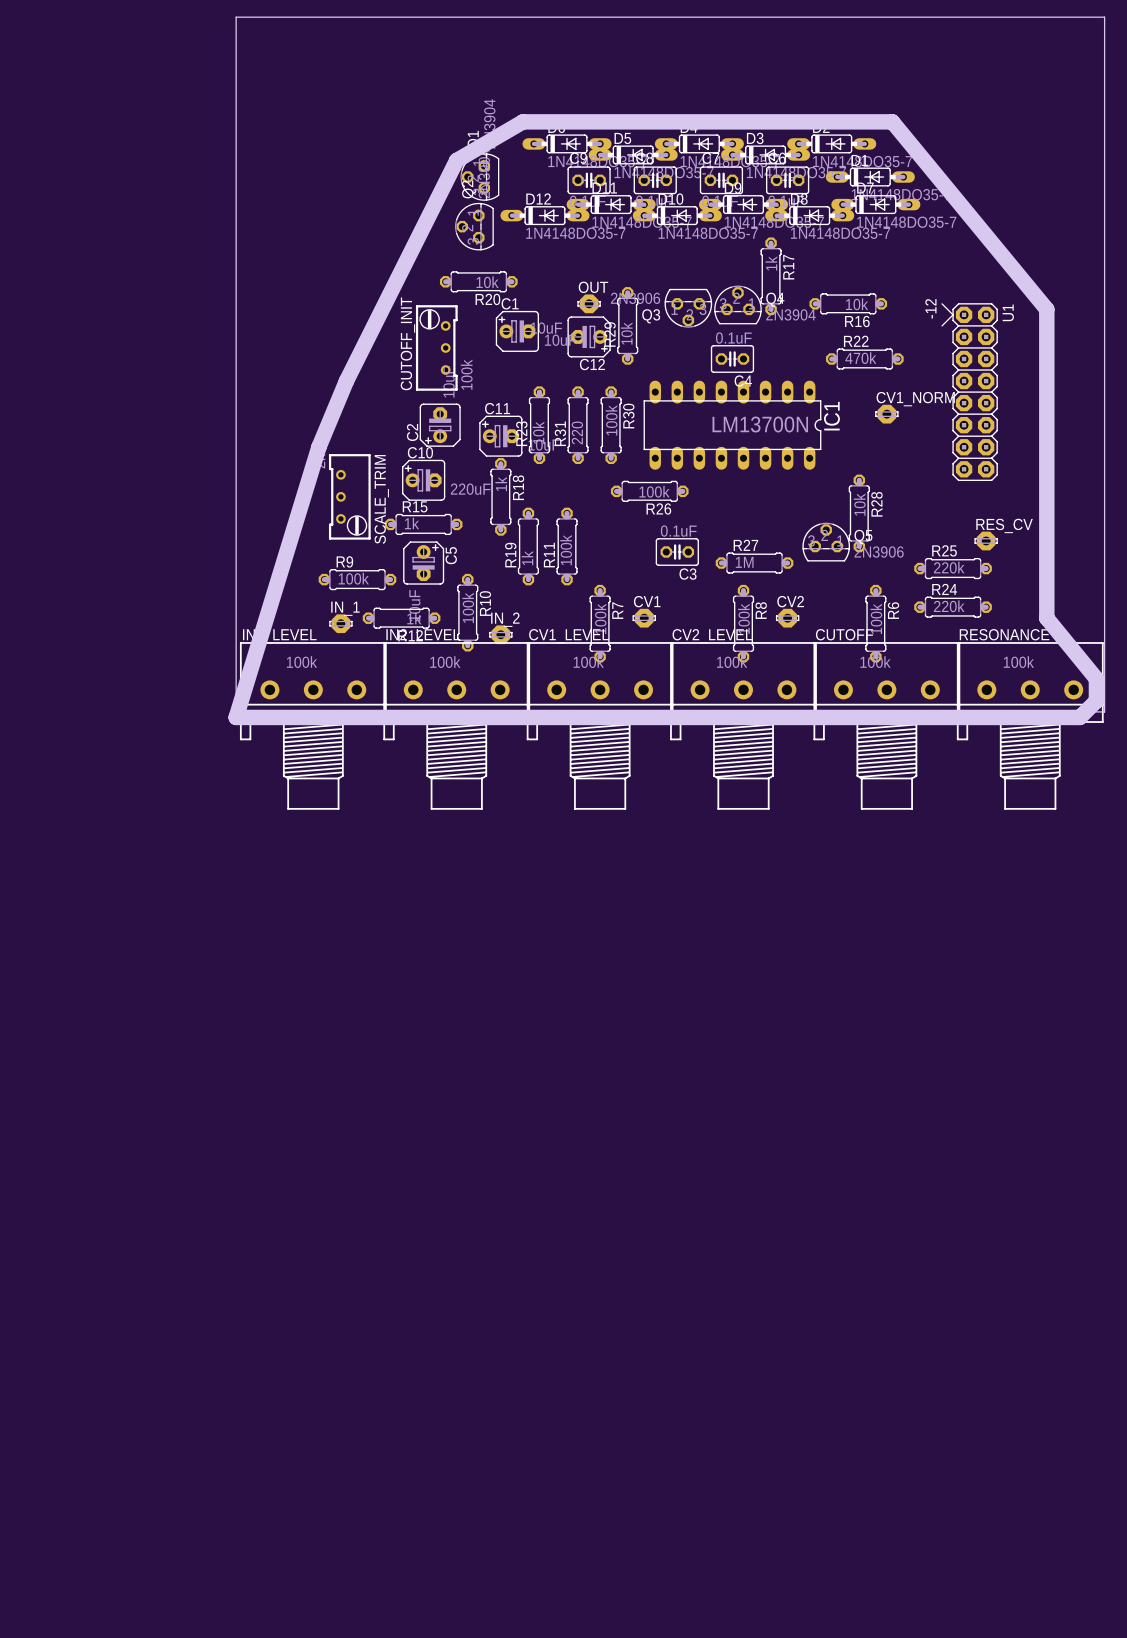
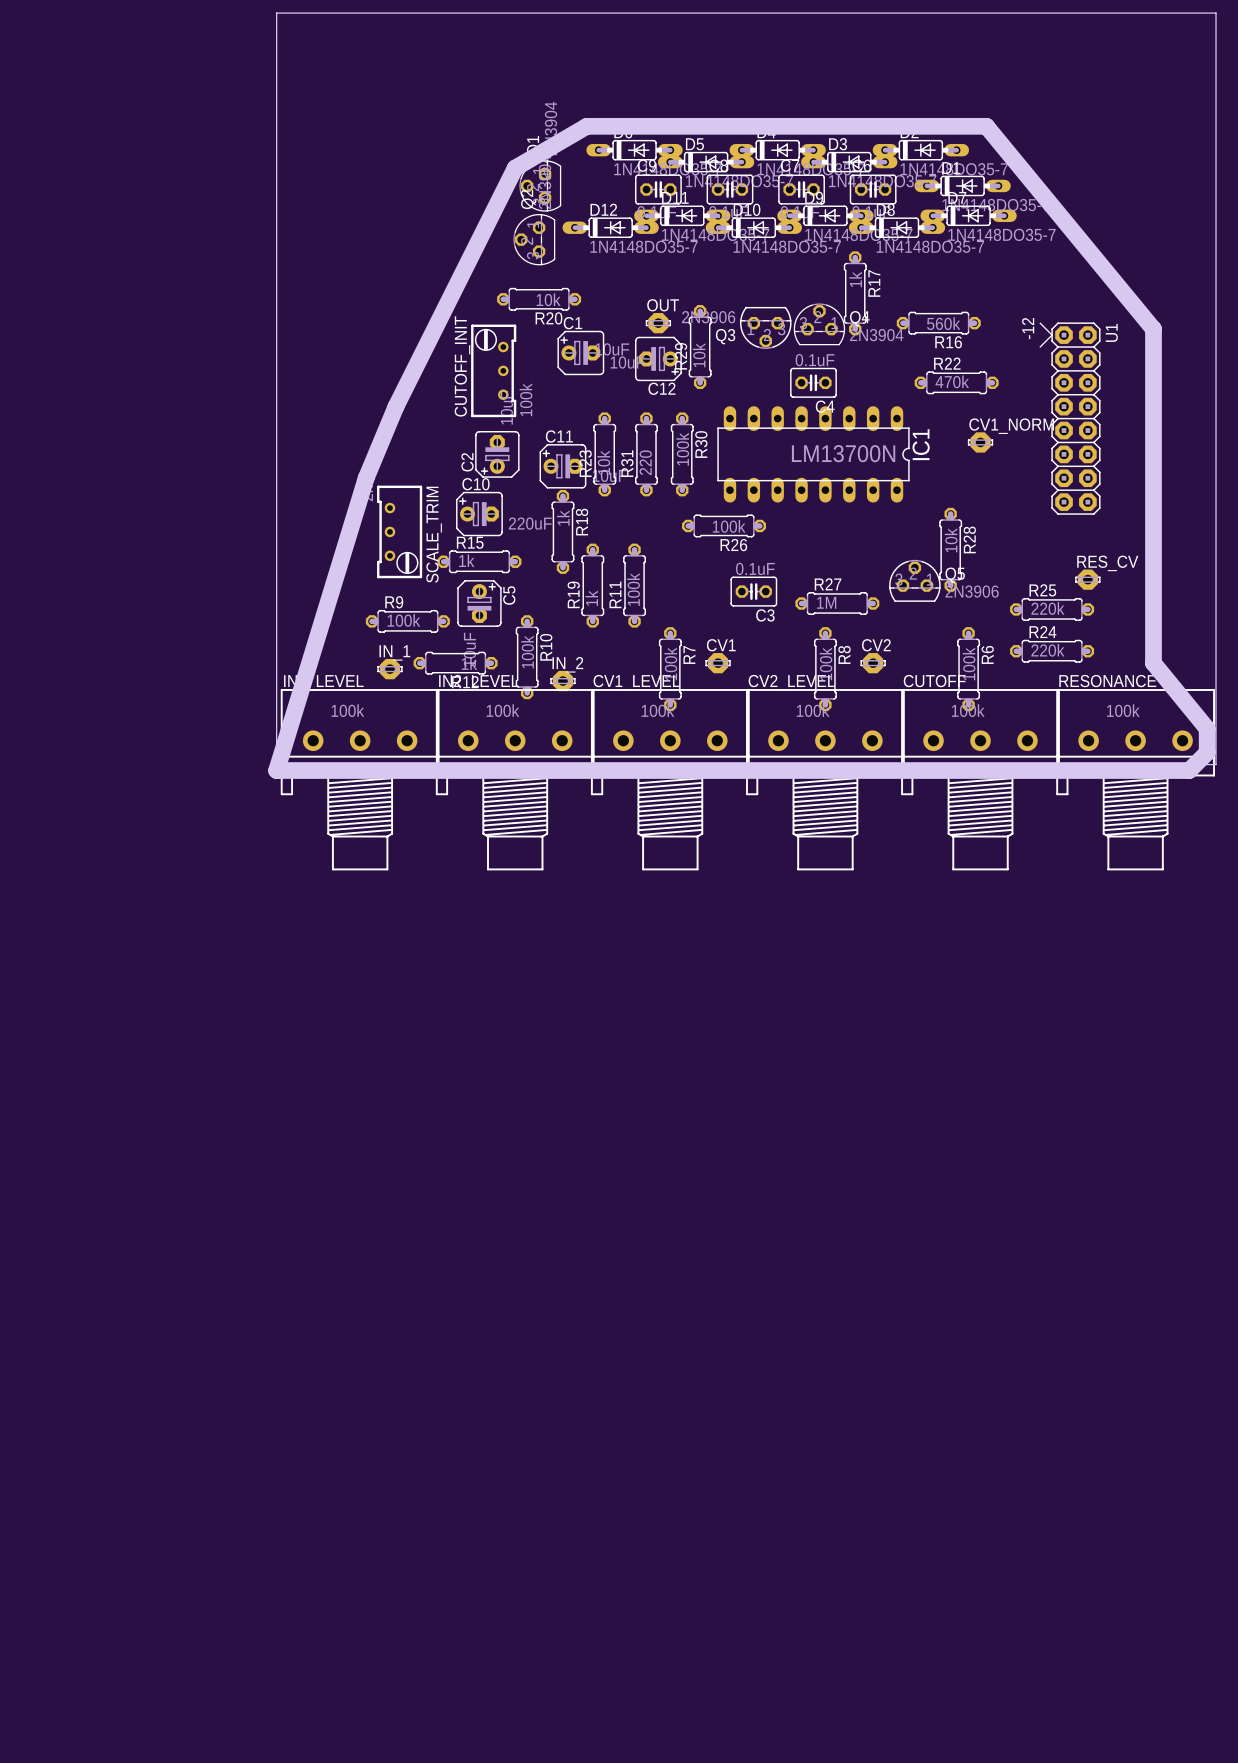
R16 value: 10k (857, 304) -> 560k (943, 323)

